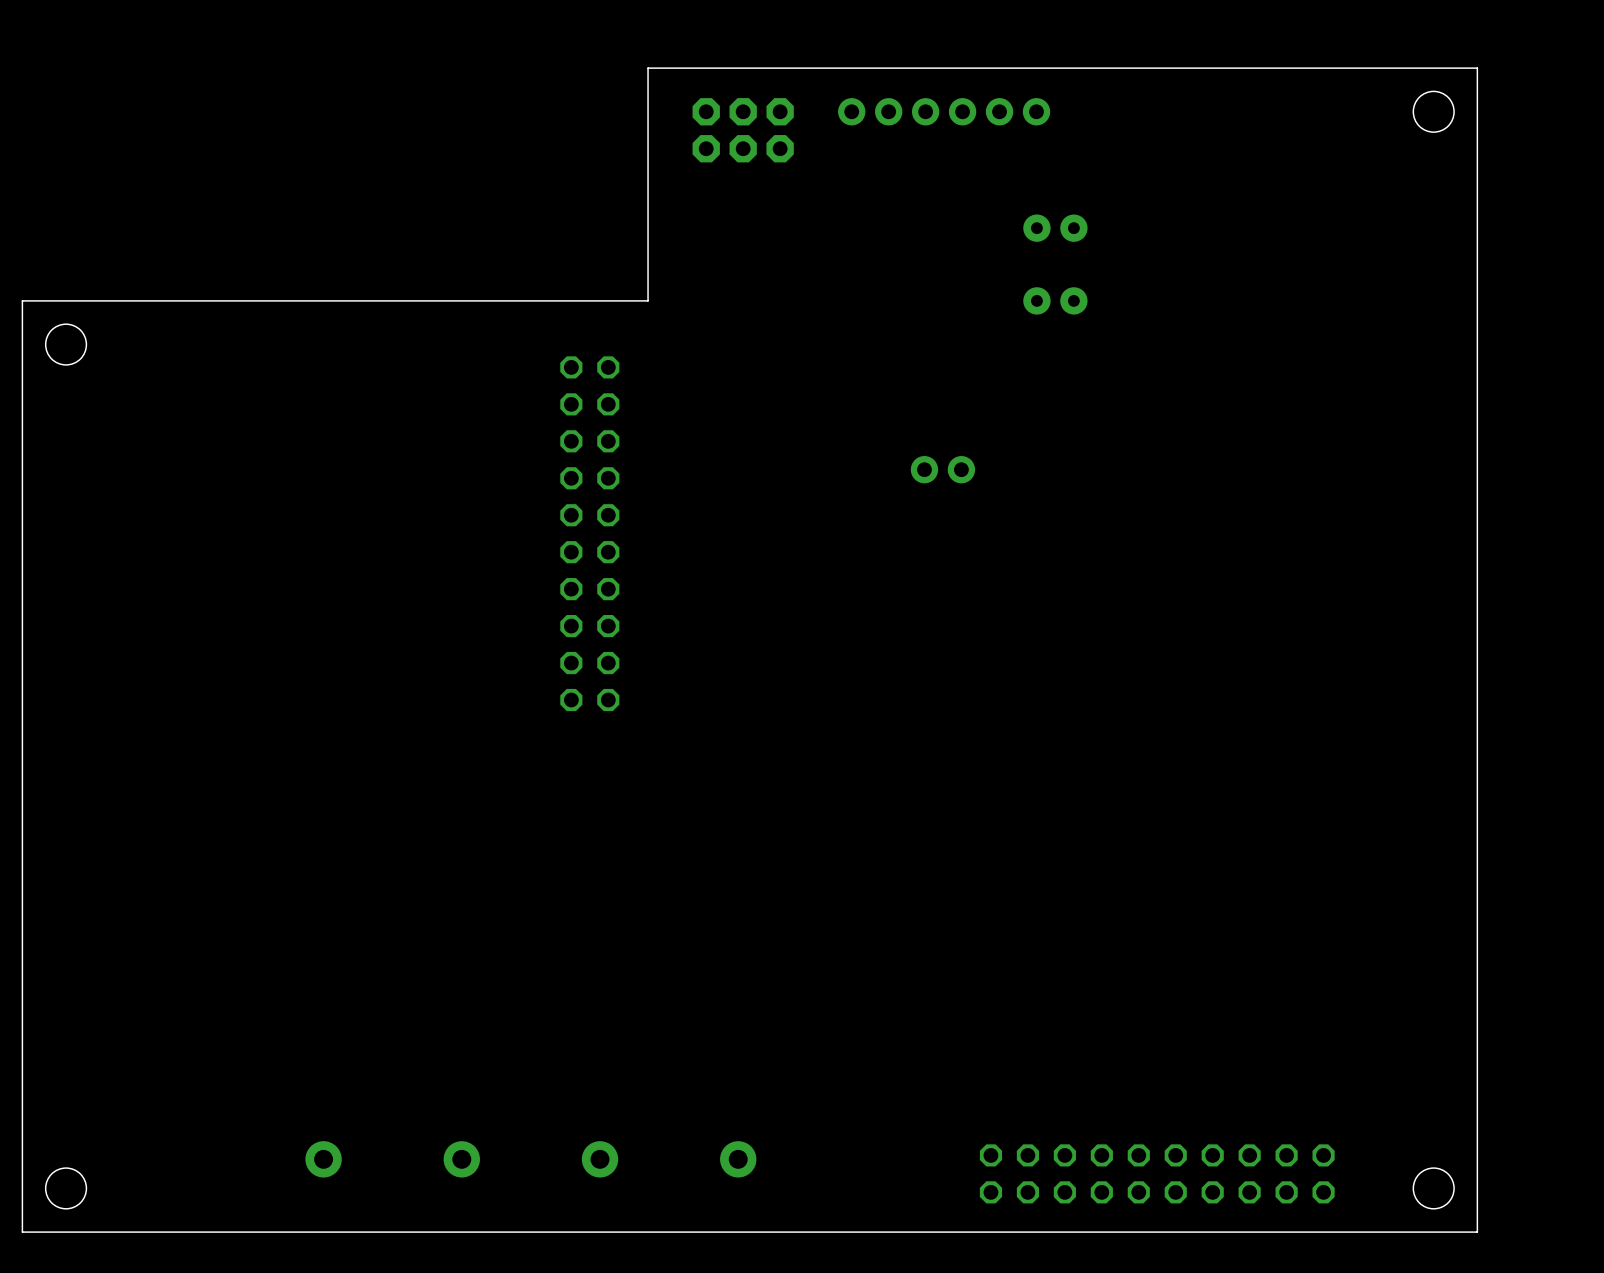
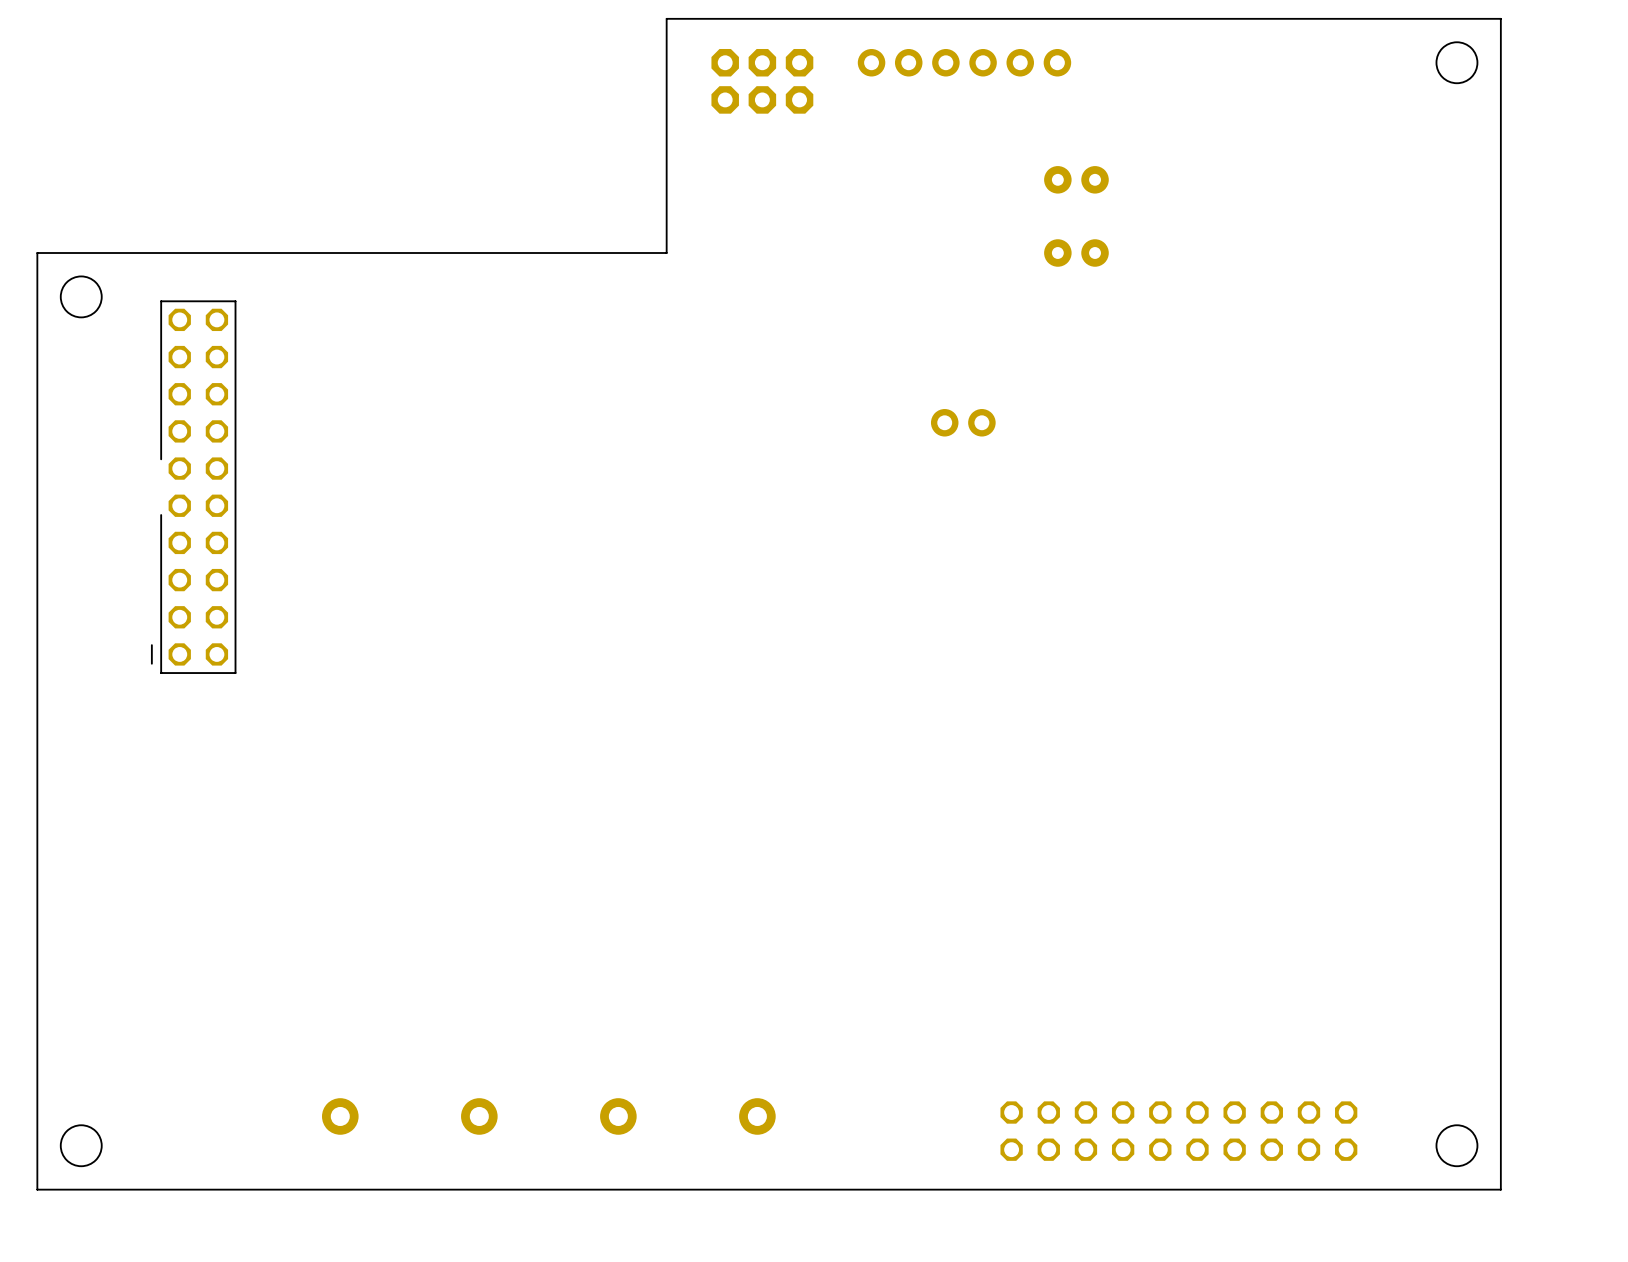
part: none -> (193, 487)
part: (589, 533) -> none

